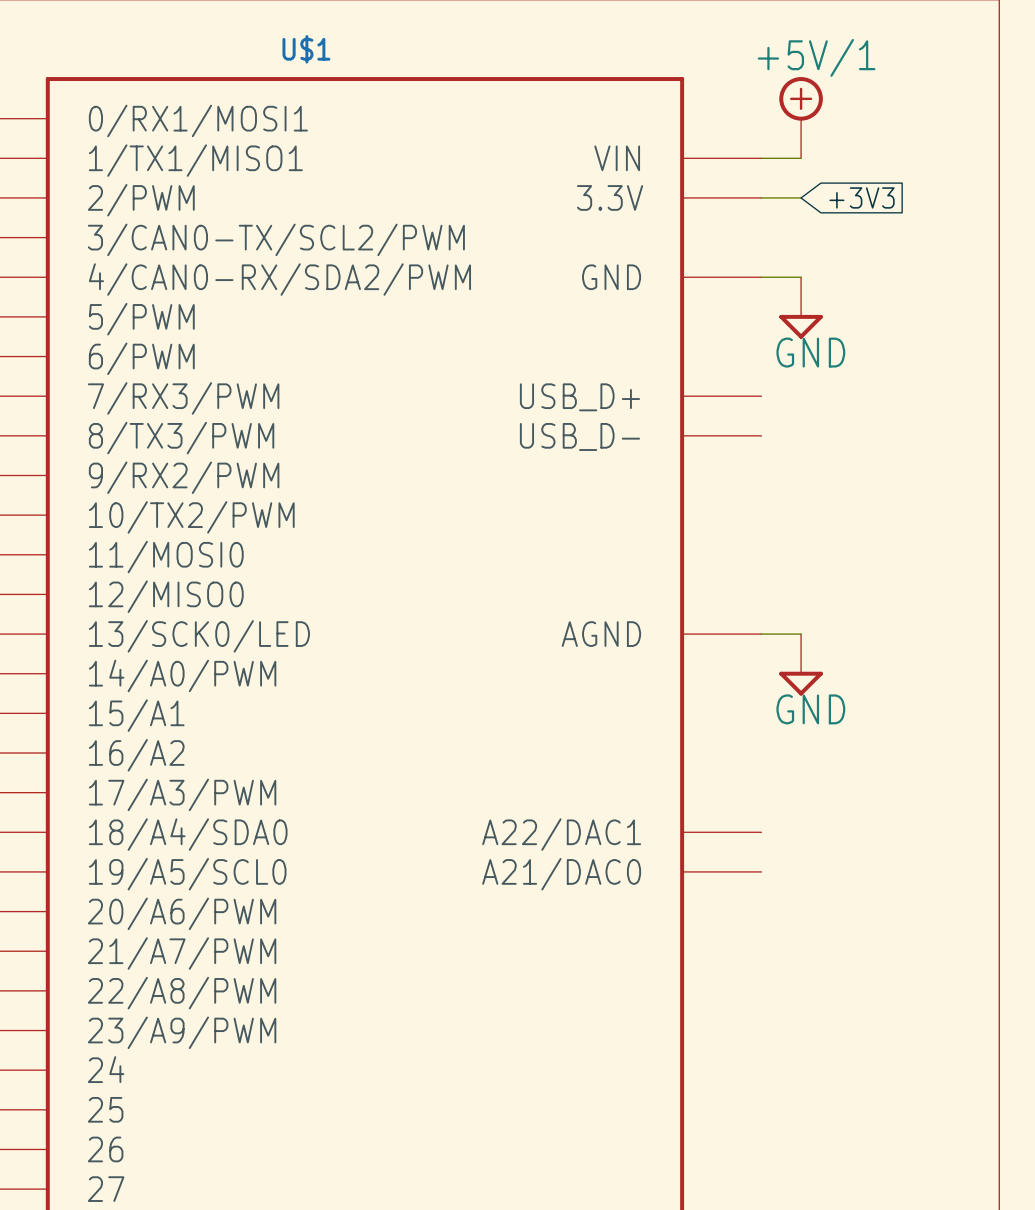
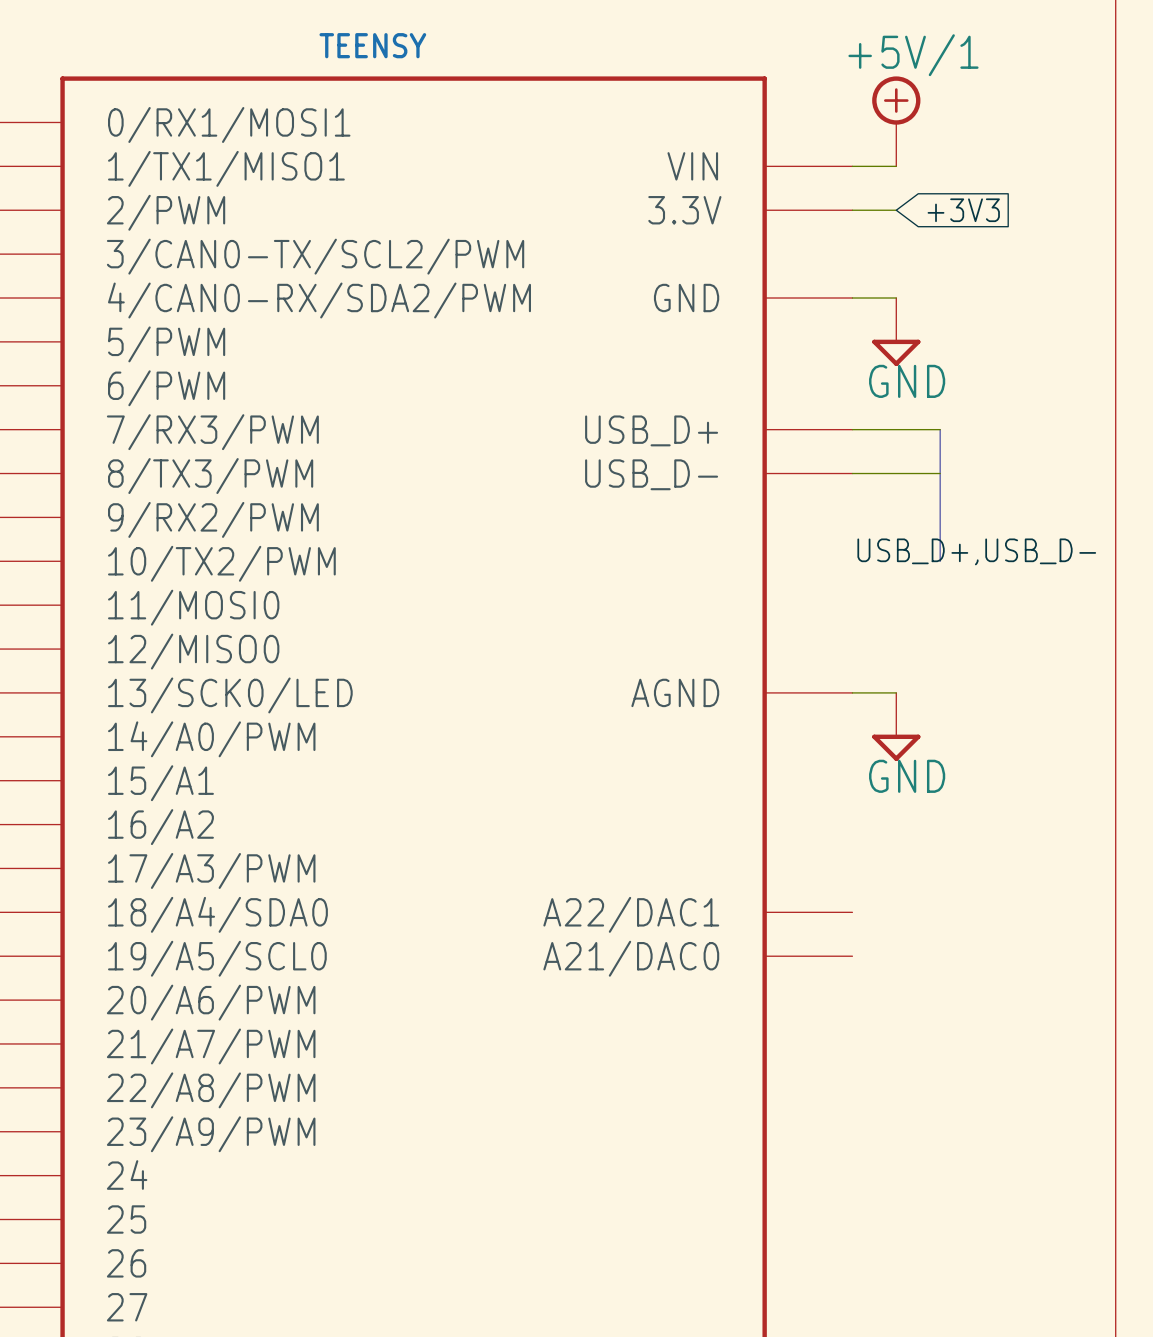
U$1 name: U$1 (306, 49) -> TEENSY (372, 45)
wire: none -> (852, 429) (940, 429)
bus: none -> (940, 429) (940, 561)
wire: none -> (852, 473) (940, 473)
label: none -> USB_D+,USB_D- (976, 551)

